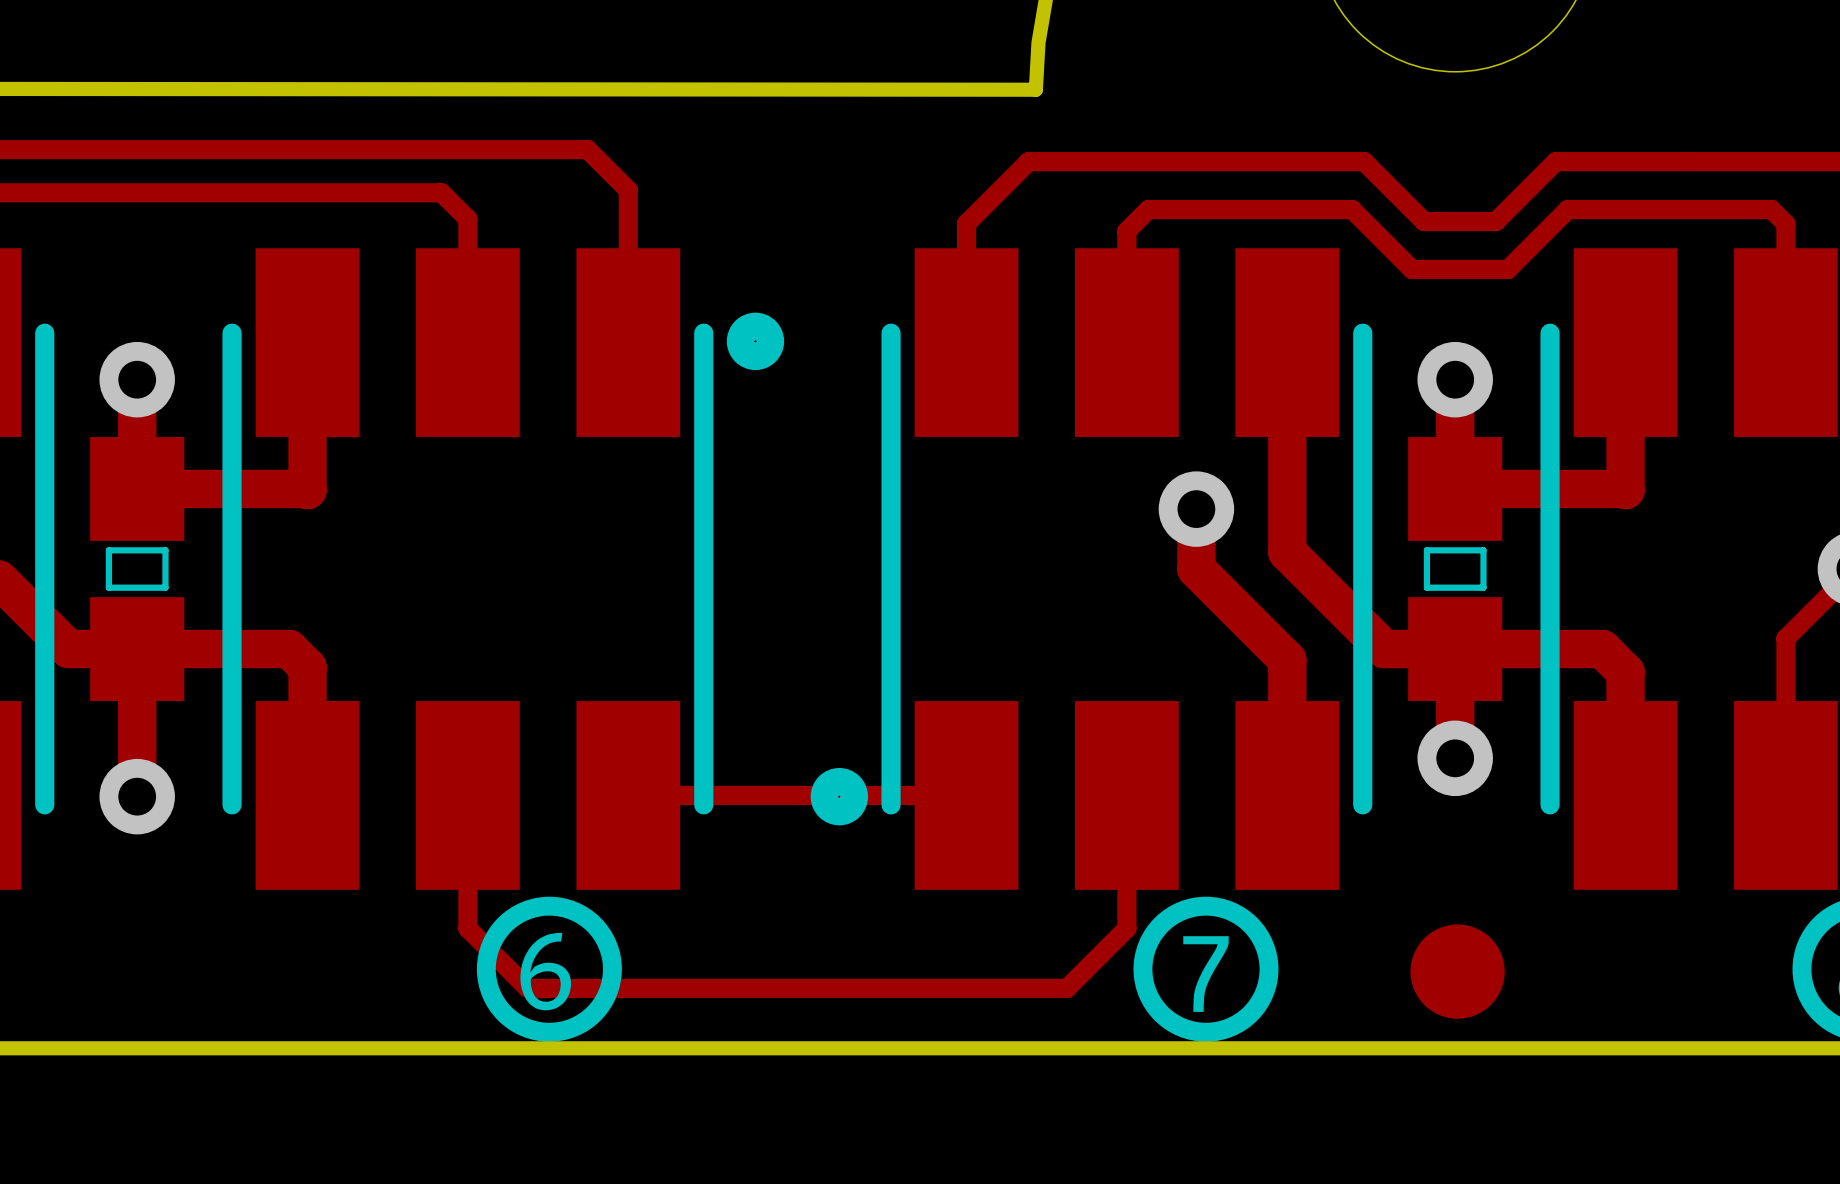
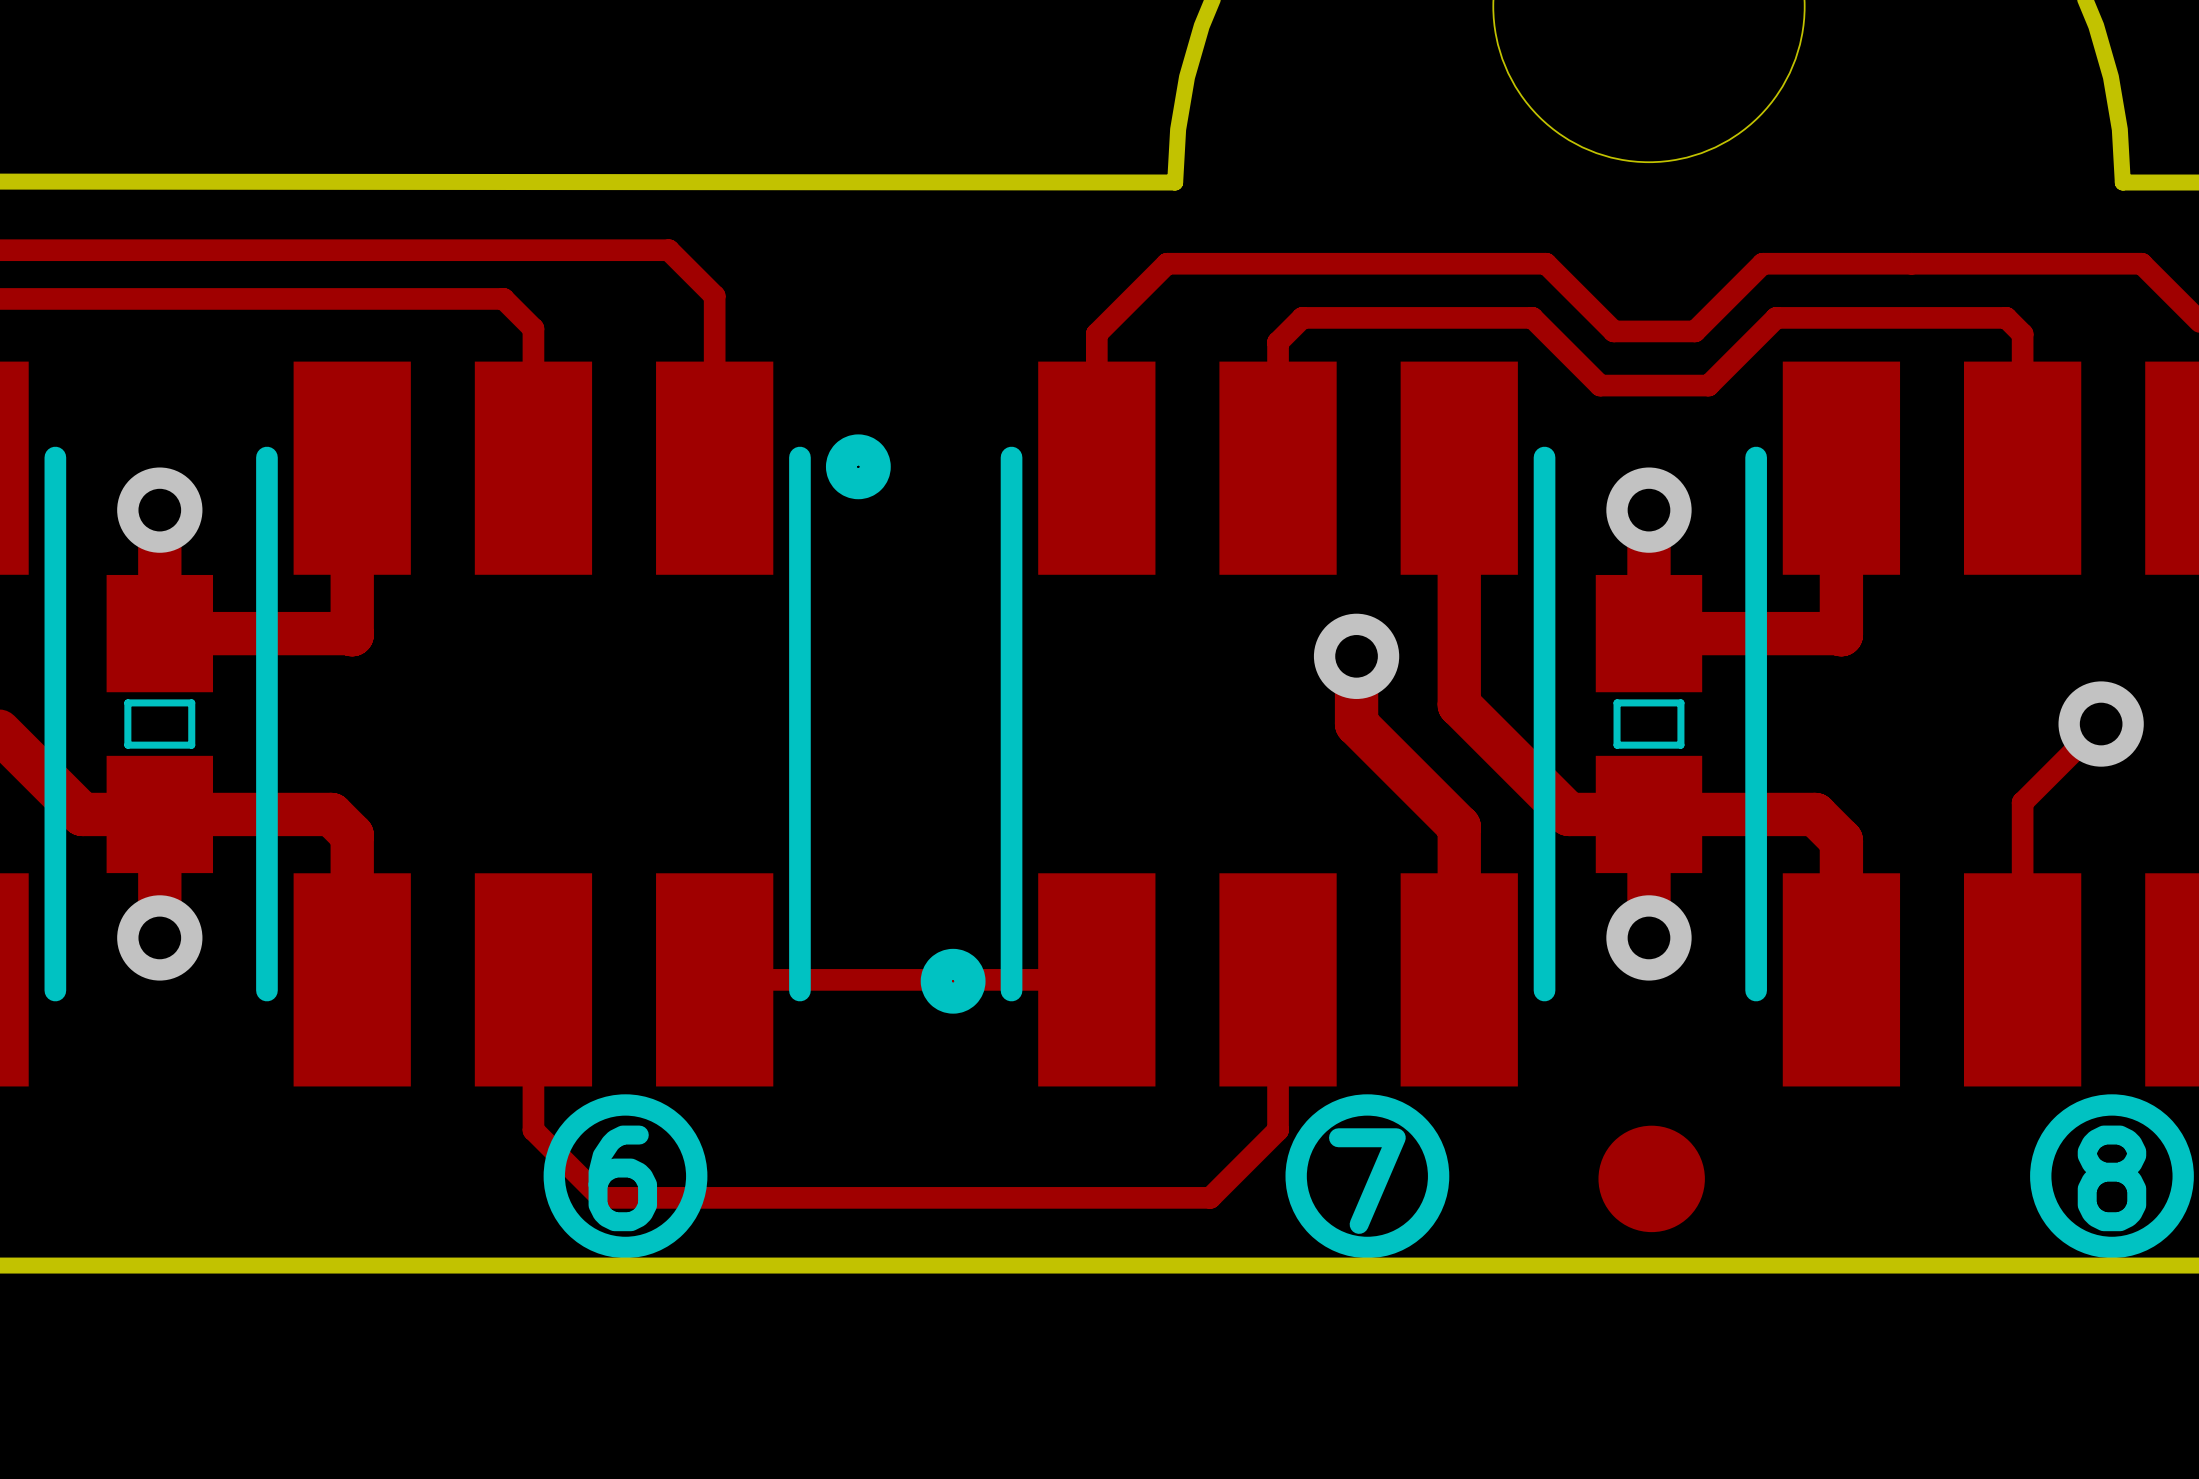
via position: (137, 796) -> (159, 937)

